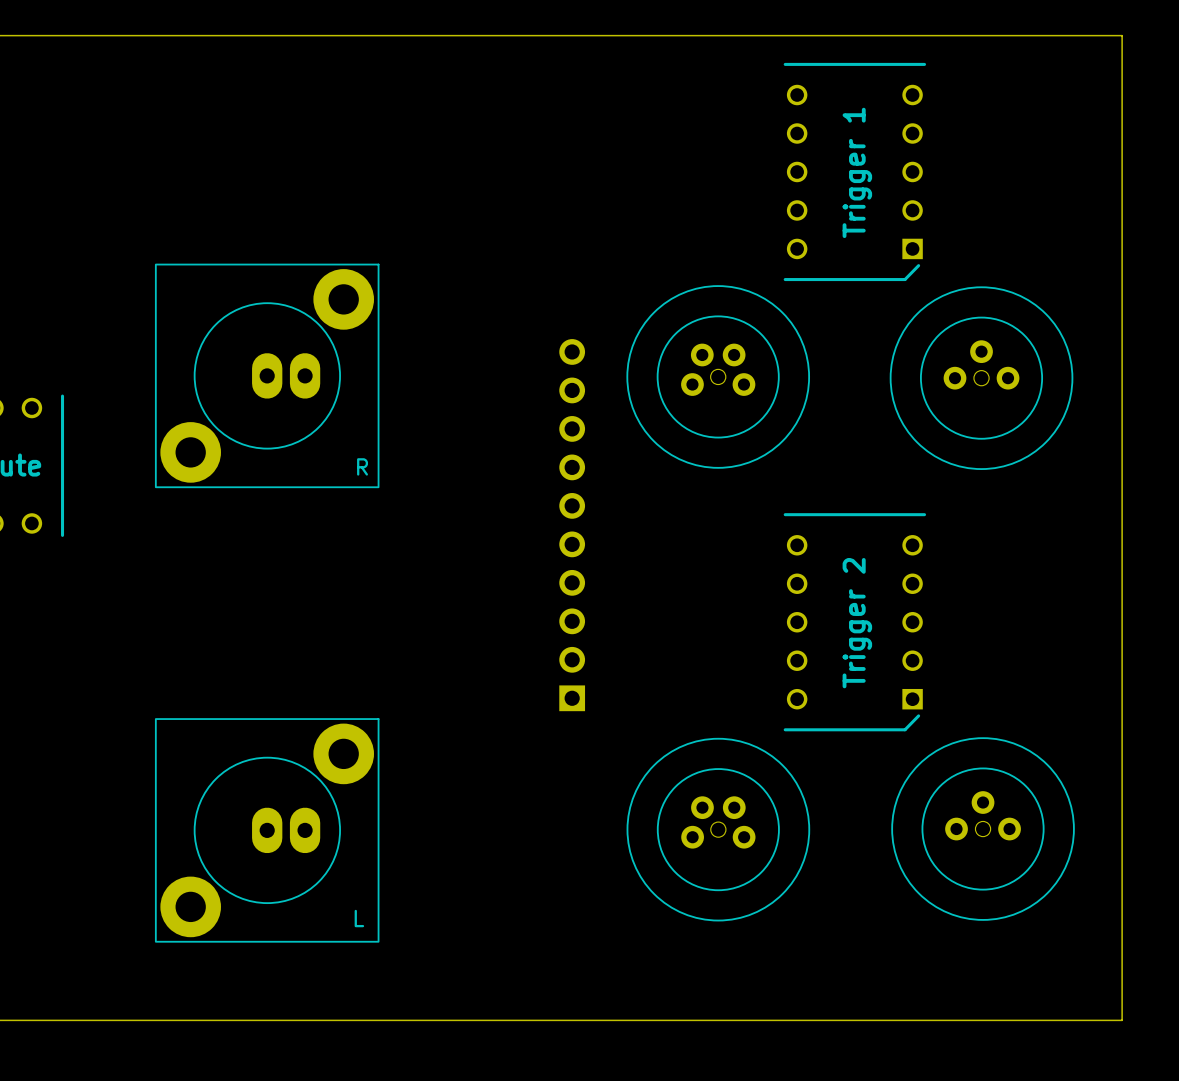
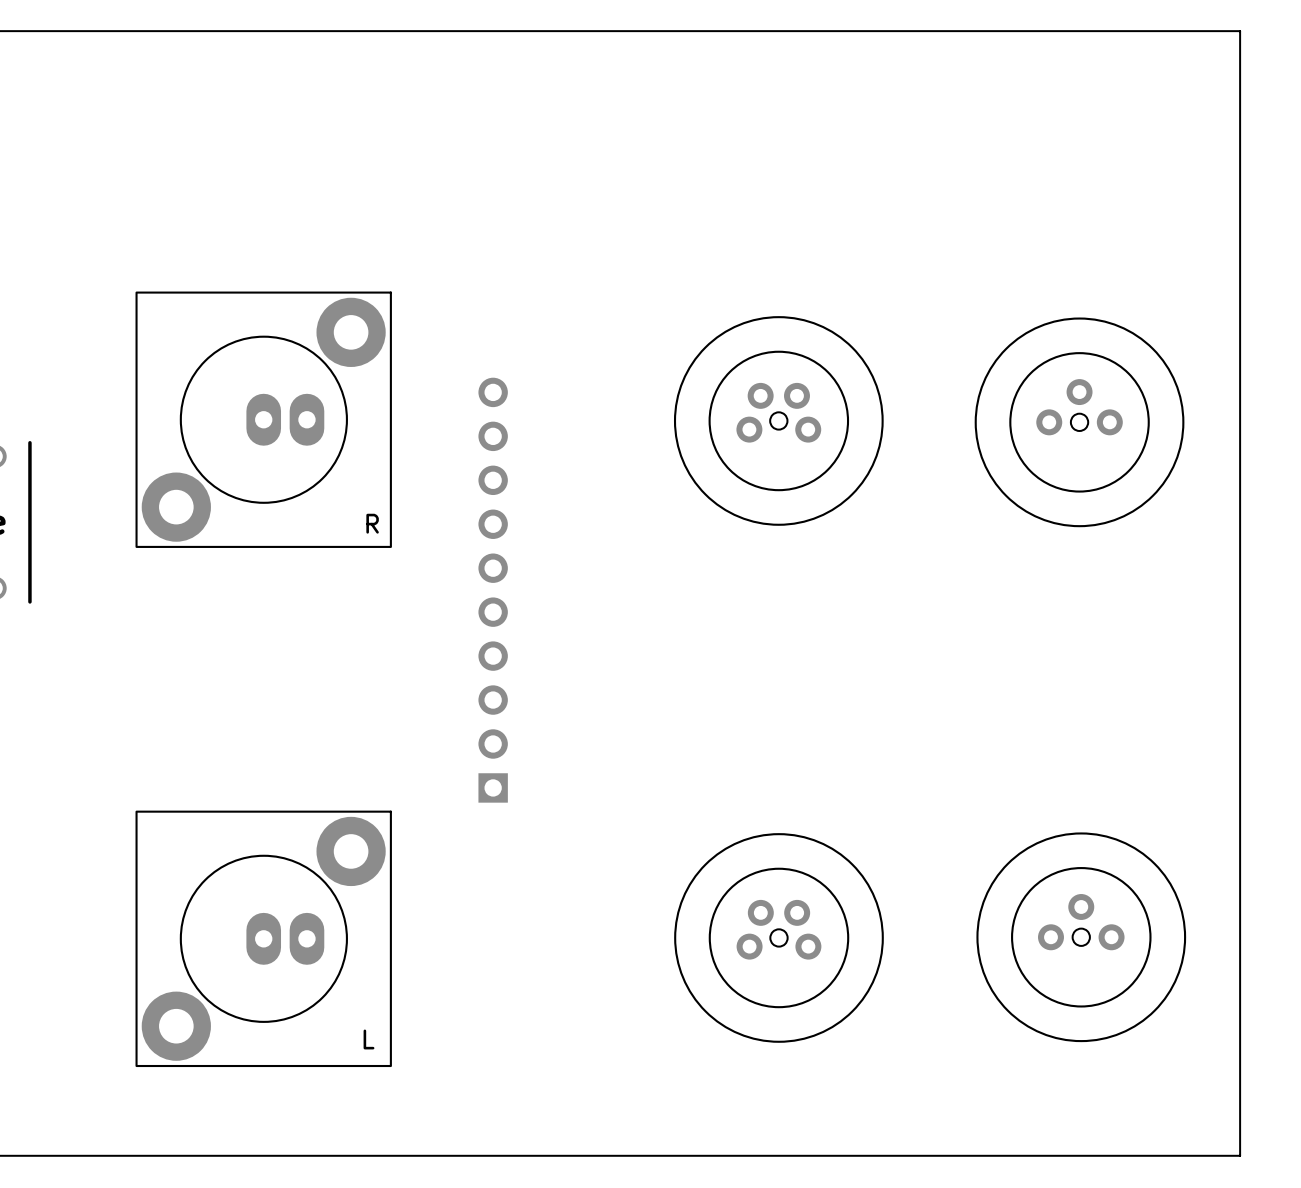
part: Trigger 1 (854, 171) -> none
part position: (572, 525) -> (493, 590)
part: Trigger 2 (854, 622) -> none

